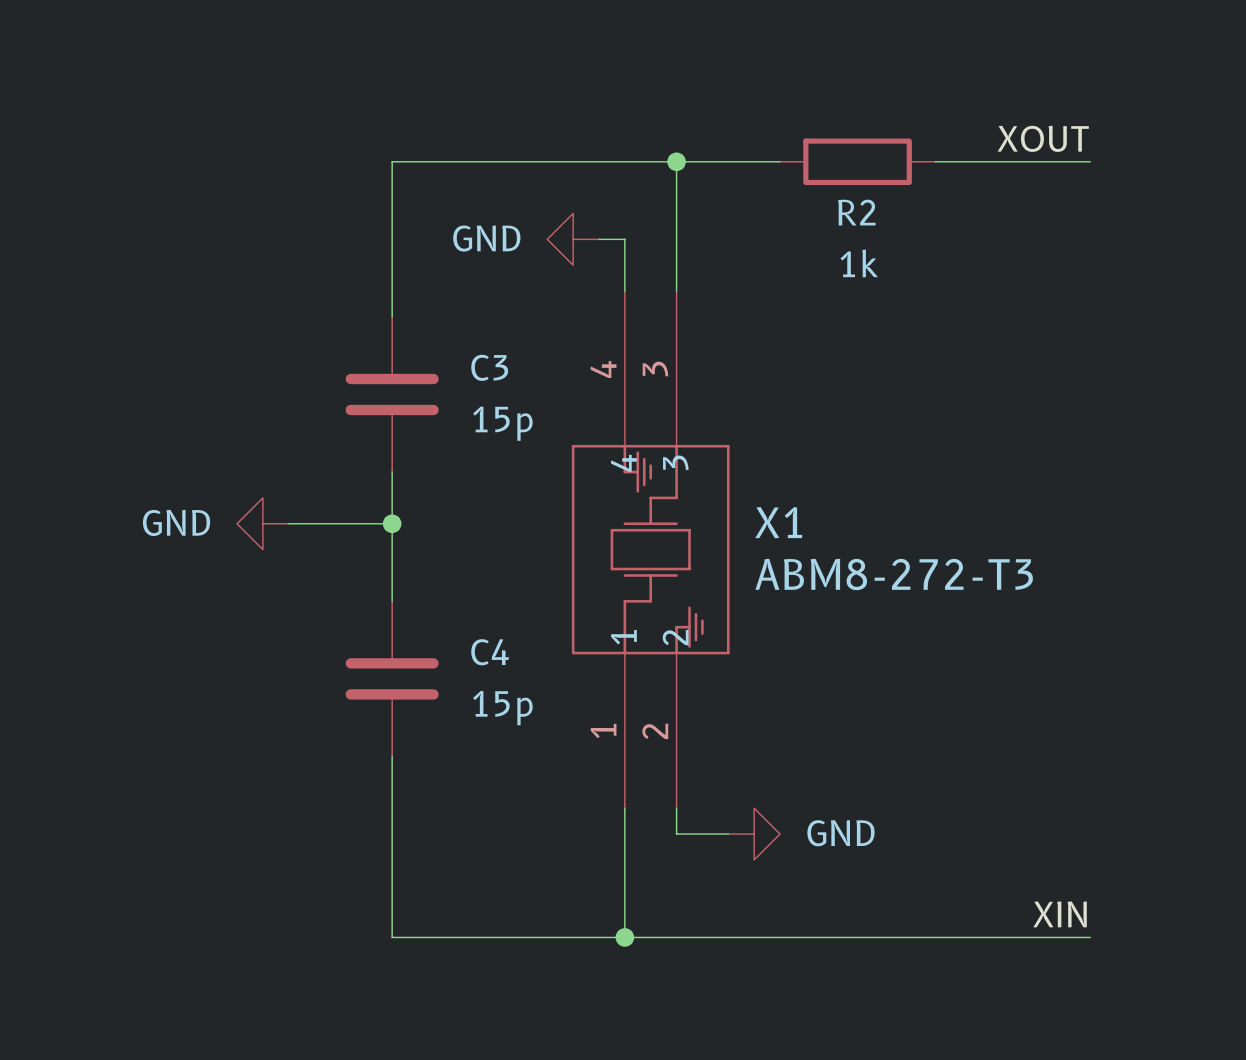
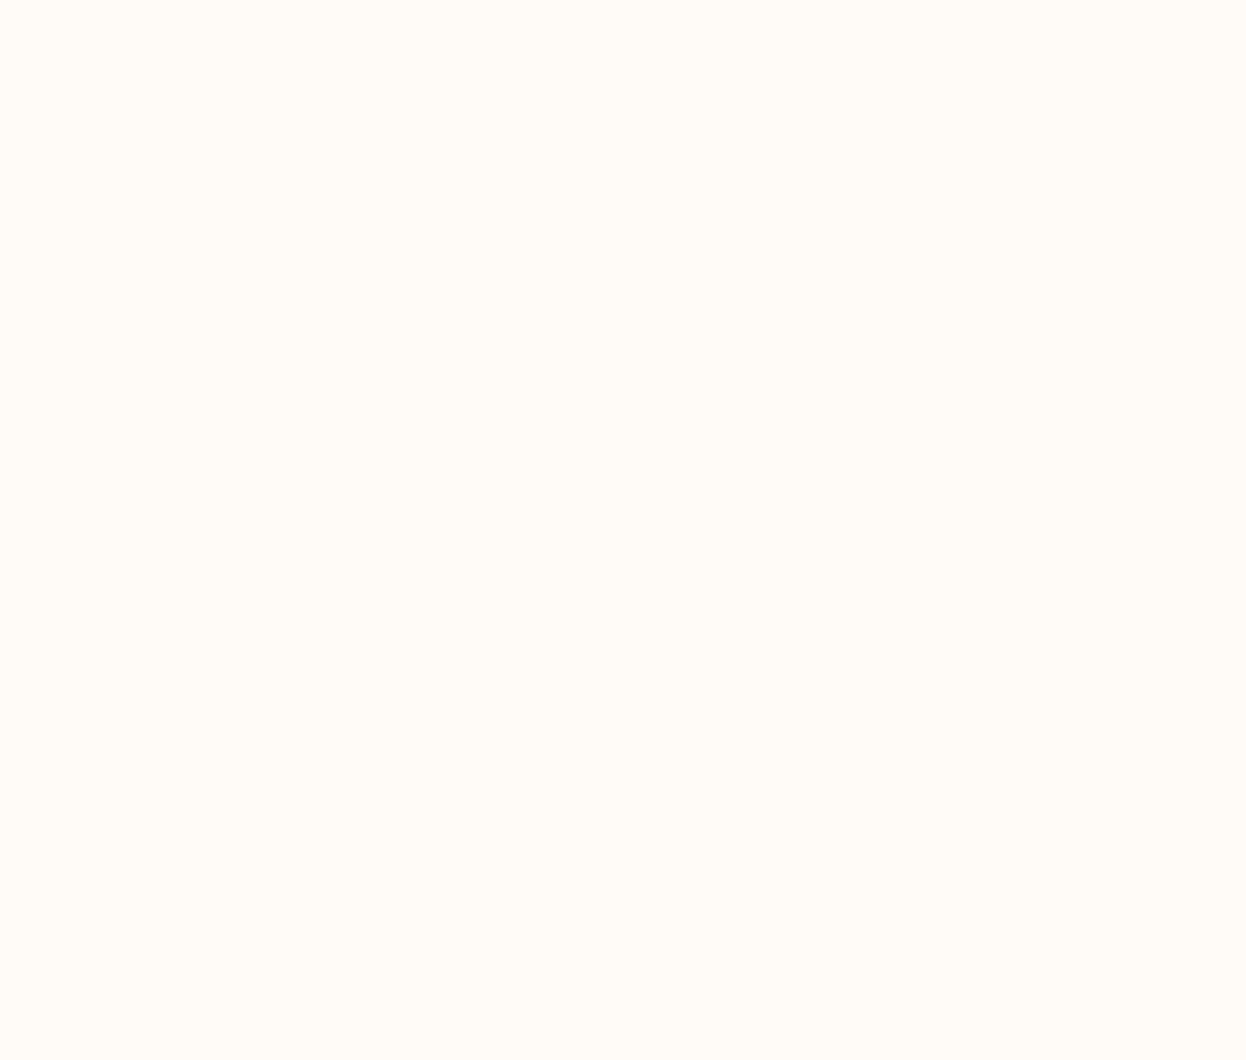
label: XOUT (1043, 138) -> none
wire: (676, 161) (676, 291) -> none
junction: (676, 161) -> none
wire: (780, 161) (392, 161) (392, 316) -> none
R2: 1k (857, 161) -> none
wire: (935, 161) (1090, 161) -> none
power symbol: GND (573, 239) -> none
wire: (599, 239) (624, 239) (624, 291) -> none
C3: 15p (392, 394) -> none
wire: (392, 472) (392, 601) -> none
power symbol: GND (262, 523) -> none
wire: (288, 523) (392, 523) -> none
junction: (392, 523) -> none
X1: ABM8-272-T3 (650, 549) -> none
C4: 15p (392, 678) -> none
wire: (392, 756) (392, 937) (1090, 937) -> none
wire: (624, 808) (624, 937) -> none
wire: (676, 808) (676, 834) (728, 834) -> none
power symbol: GND (754, 834) -> none
label: XIN (1060, 914) -> none
junction: (624, 937) -> none

